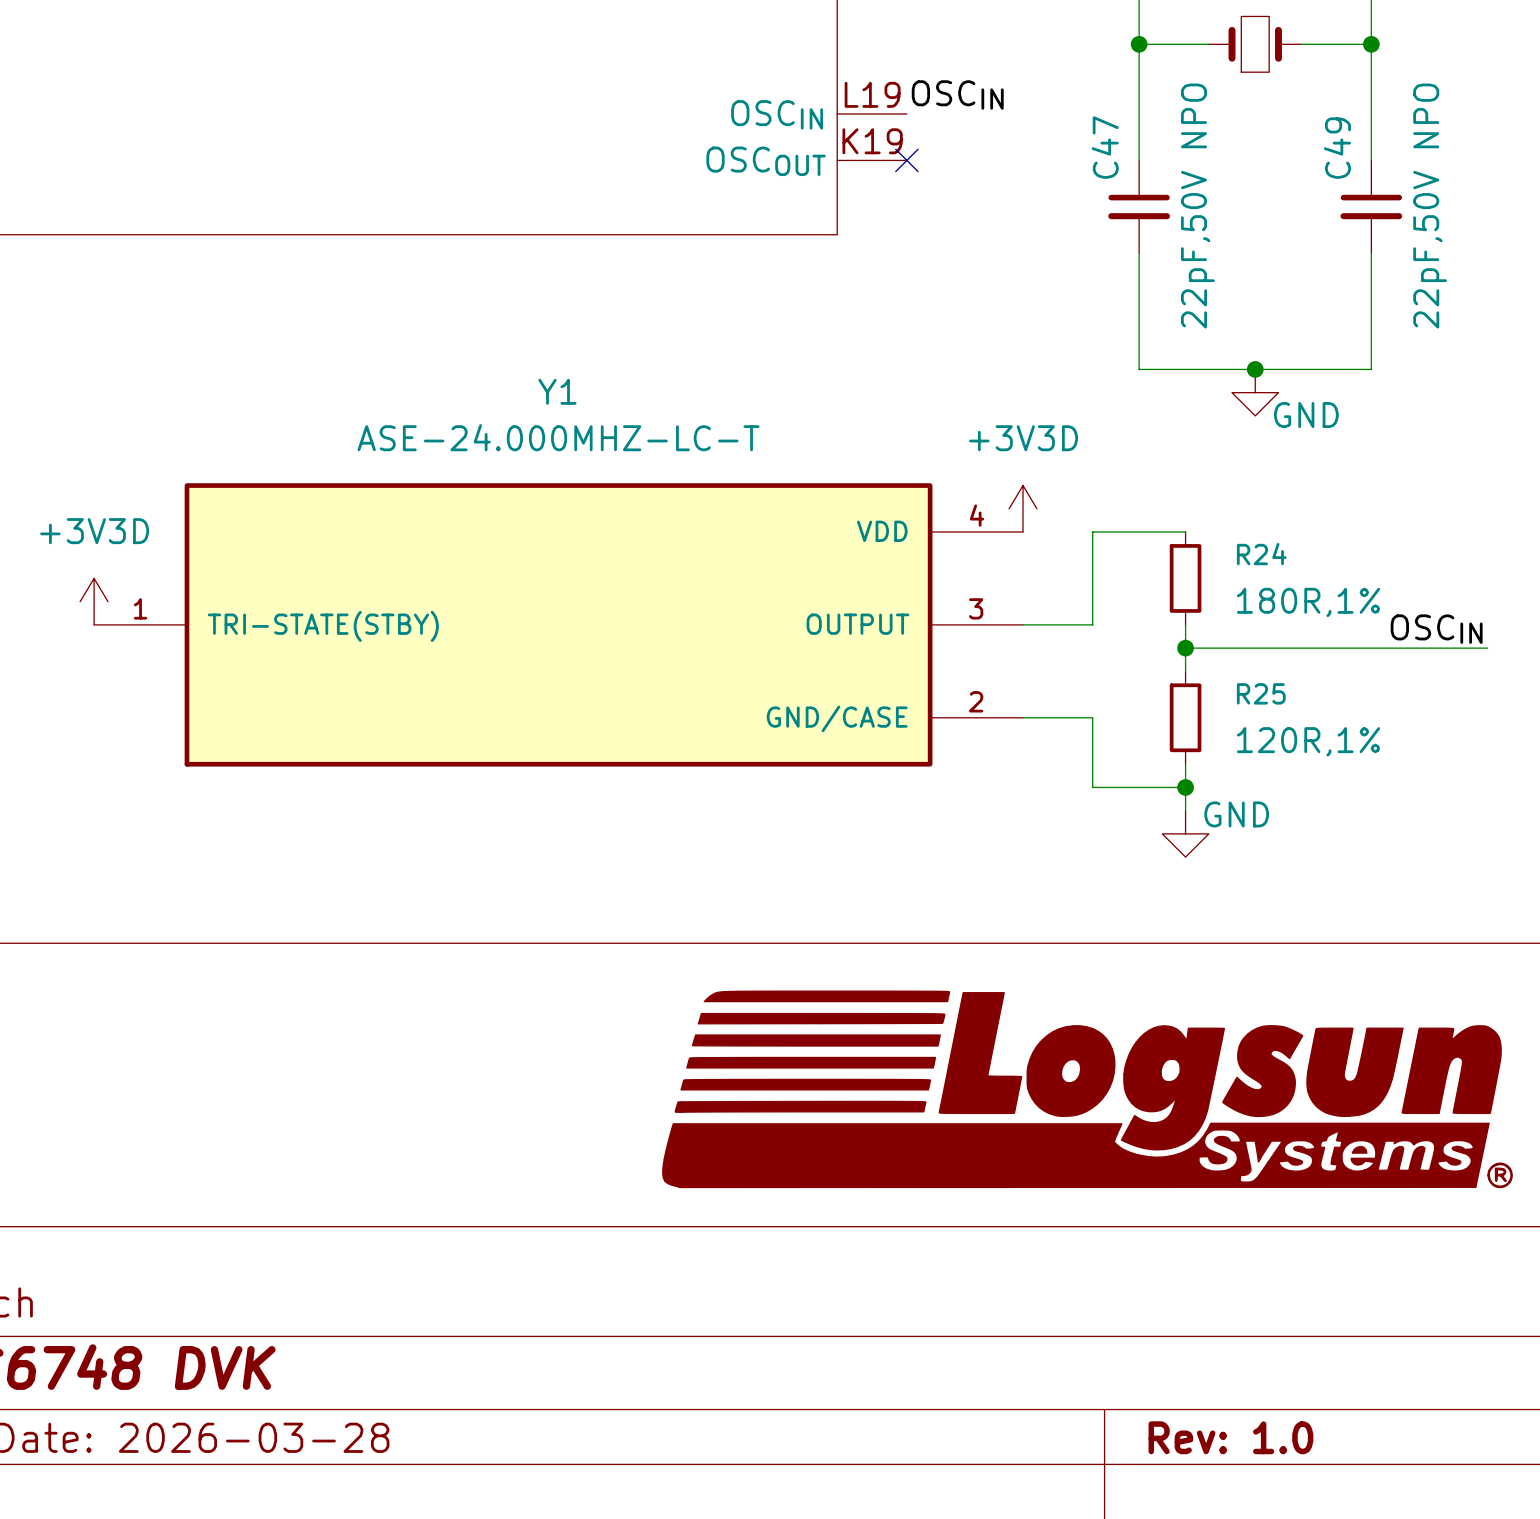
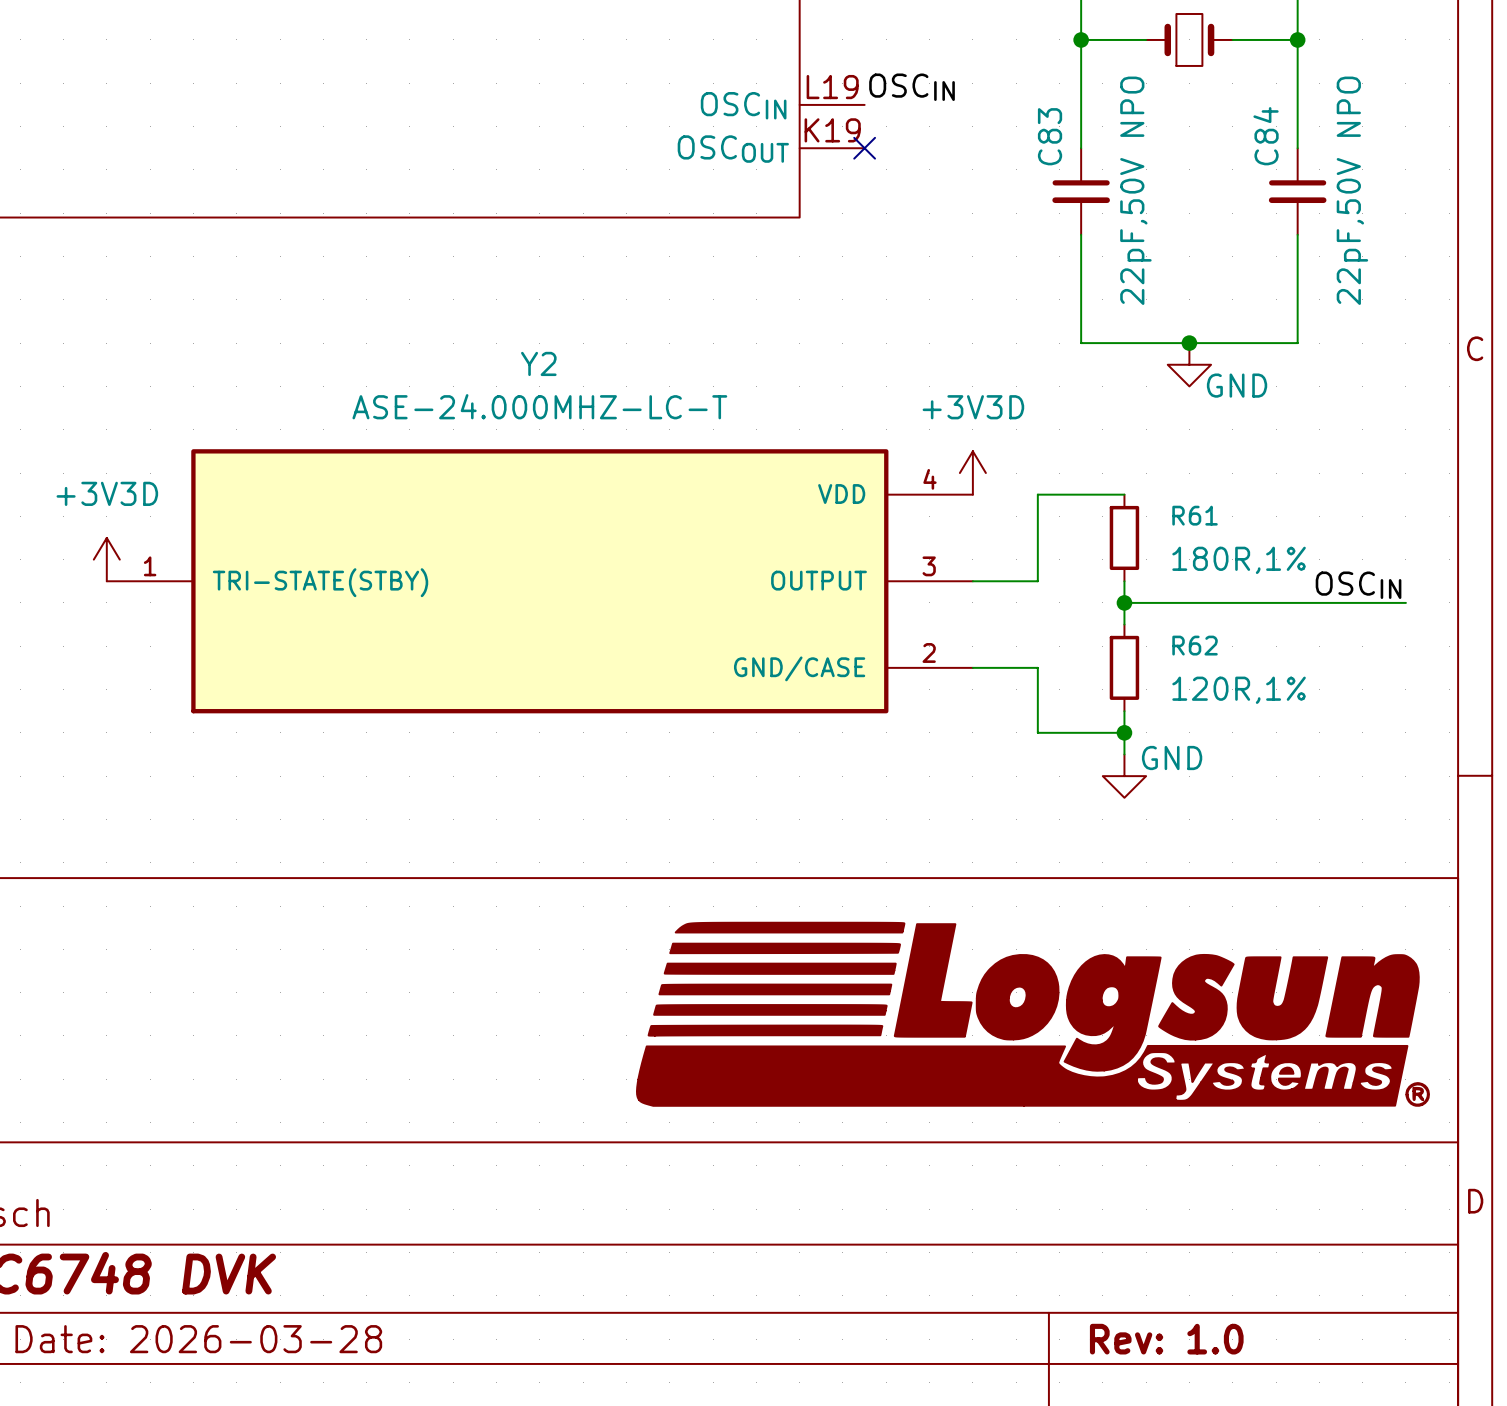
C47 name: C47 (1105, 147) -> C83 (1050, 136)
C49 name: C49 (1337, 148) -> C84 (1266, 136)
Y1 name: Y1 (557, 391) -> Y2 (538, 363)
R24 name: R24 (1261, 554) -> R61 (1195, 515)
R25 name: R25 (1261, 693) -> R62 (1195, 645)

